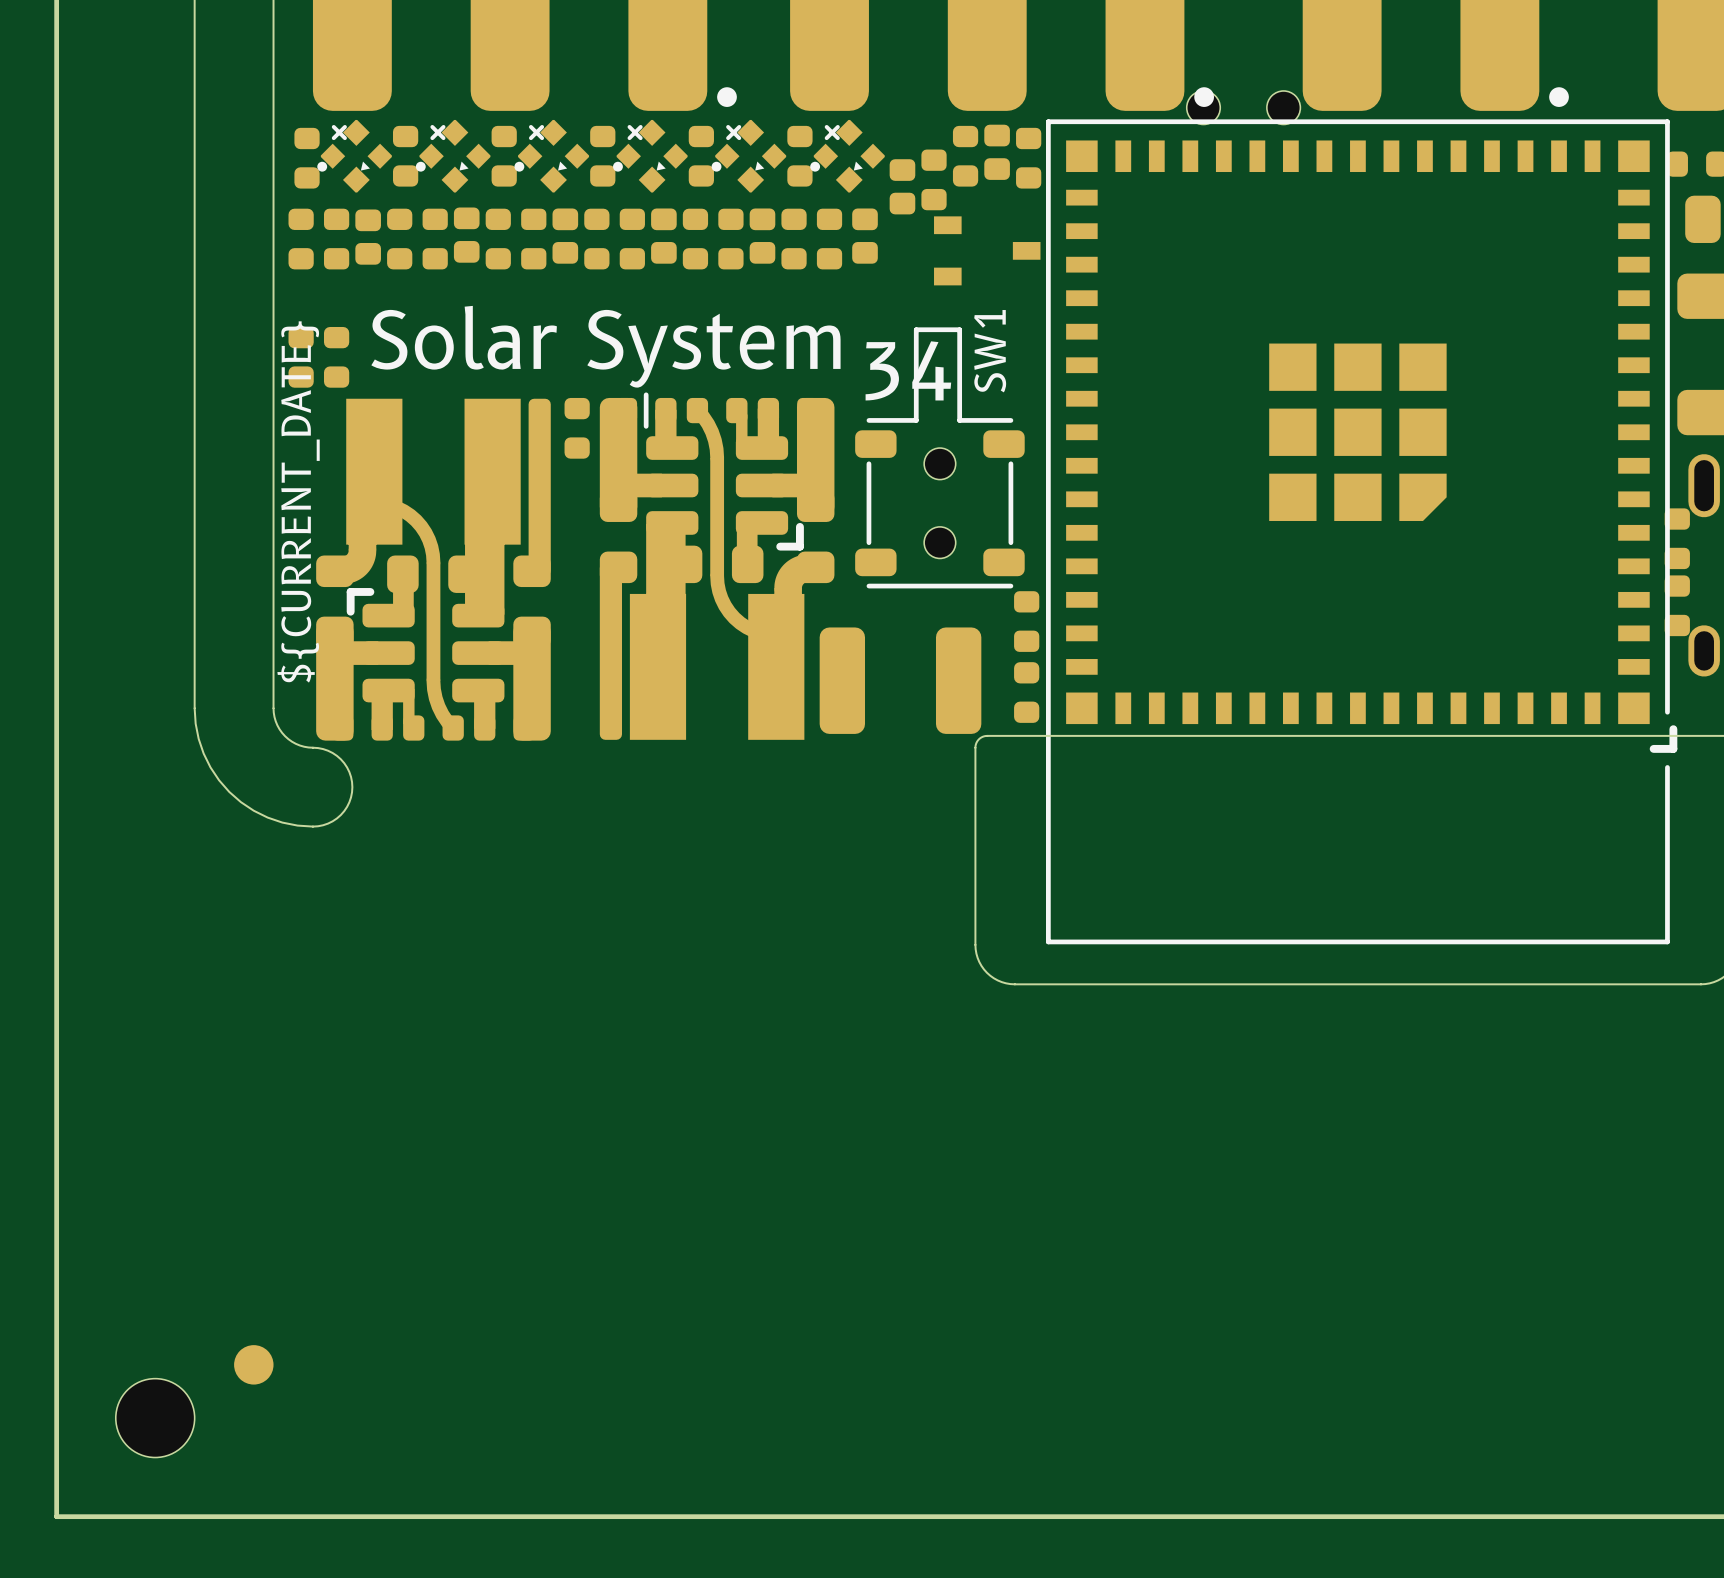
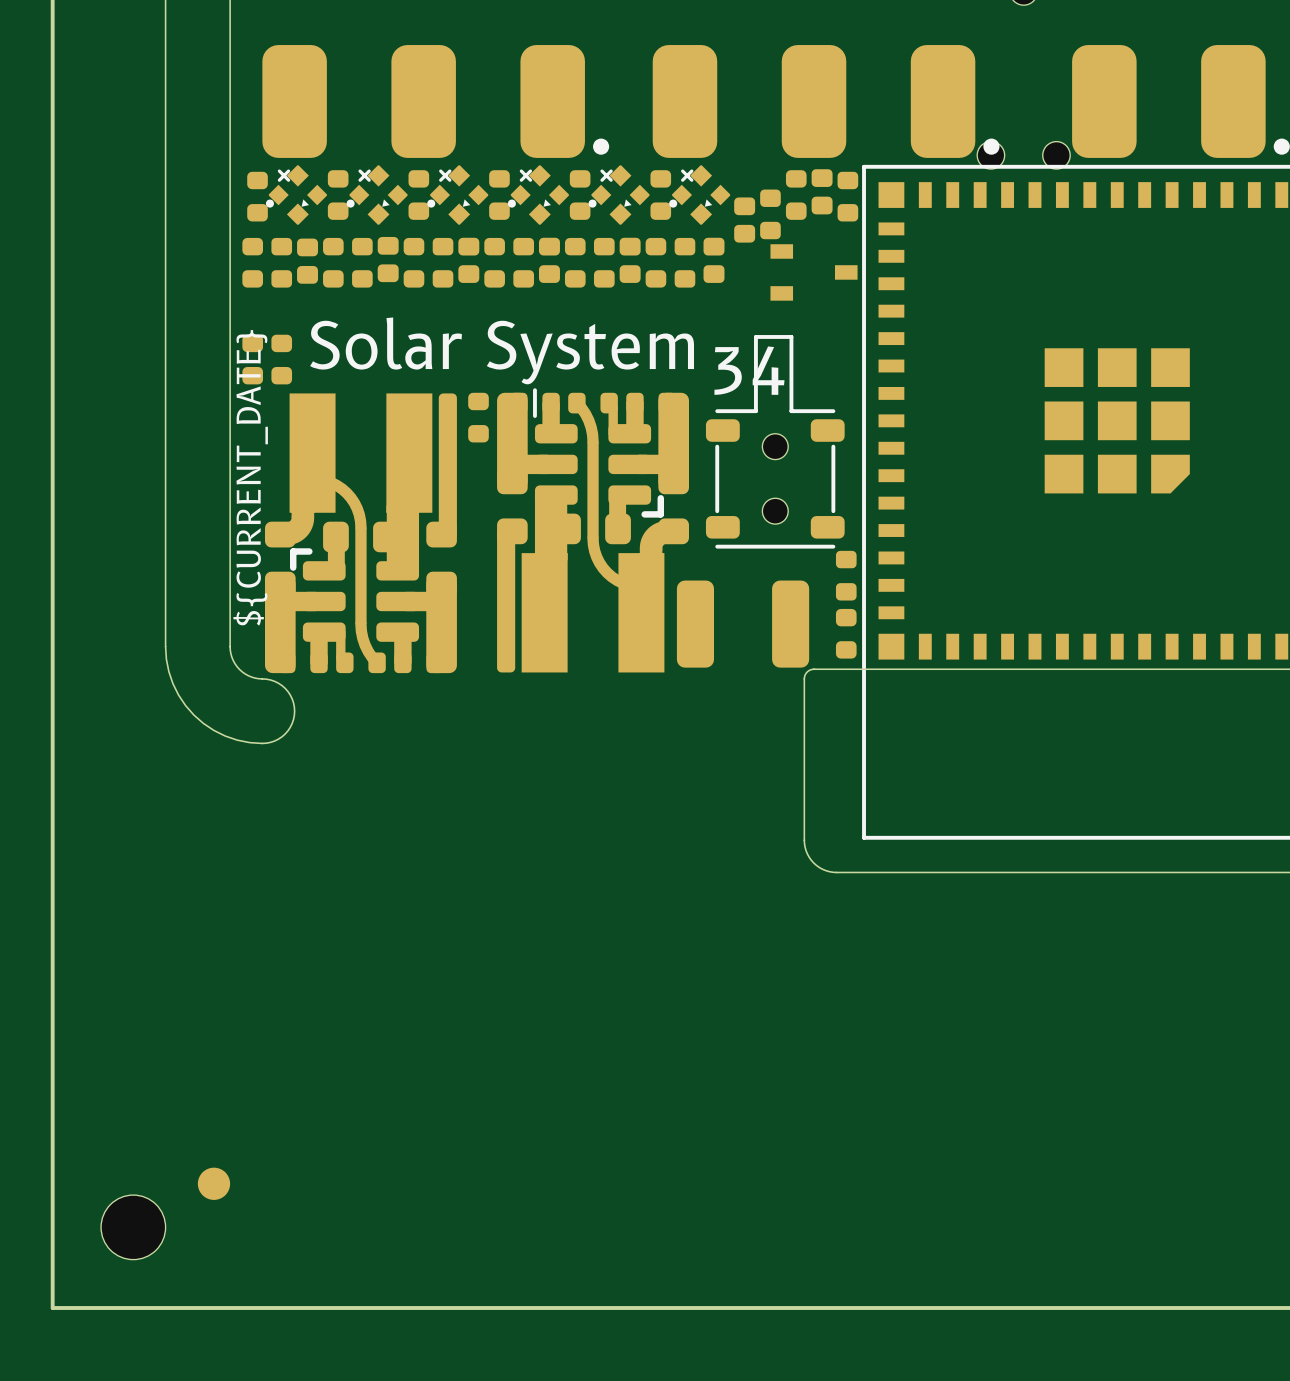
SW1 name: SW1 (990, 351) -> none

